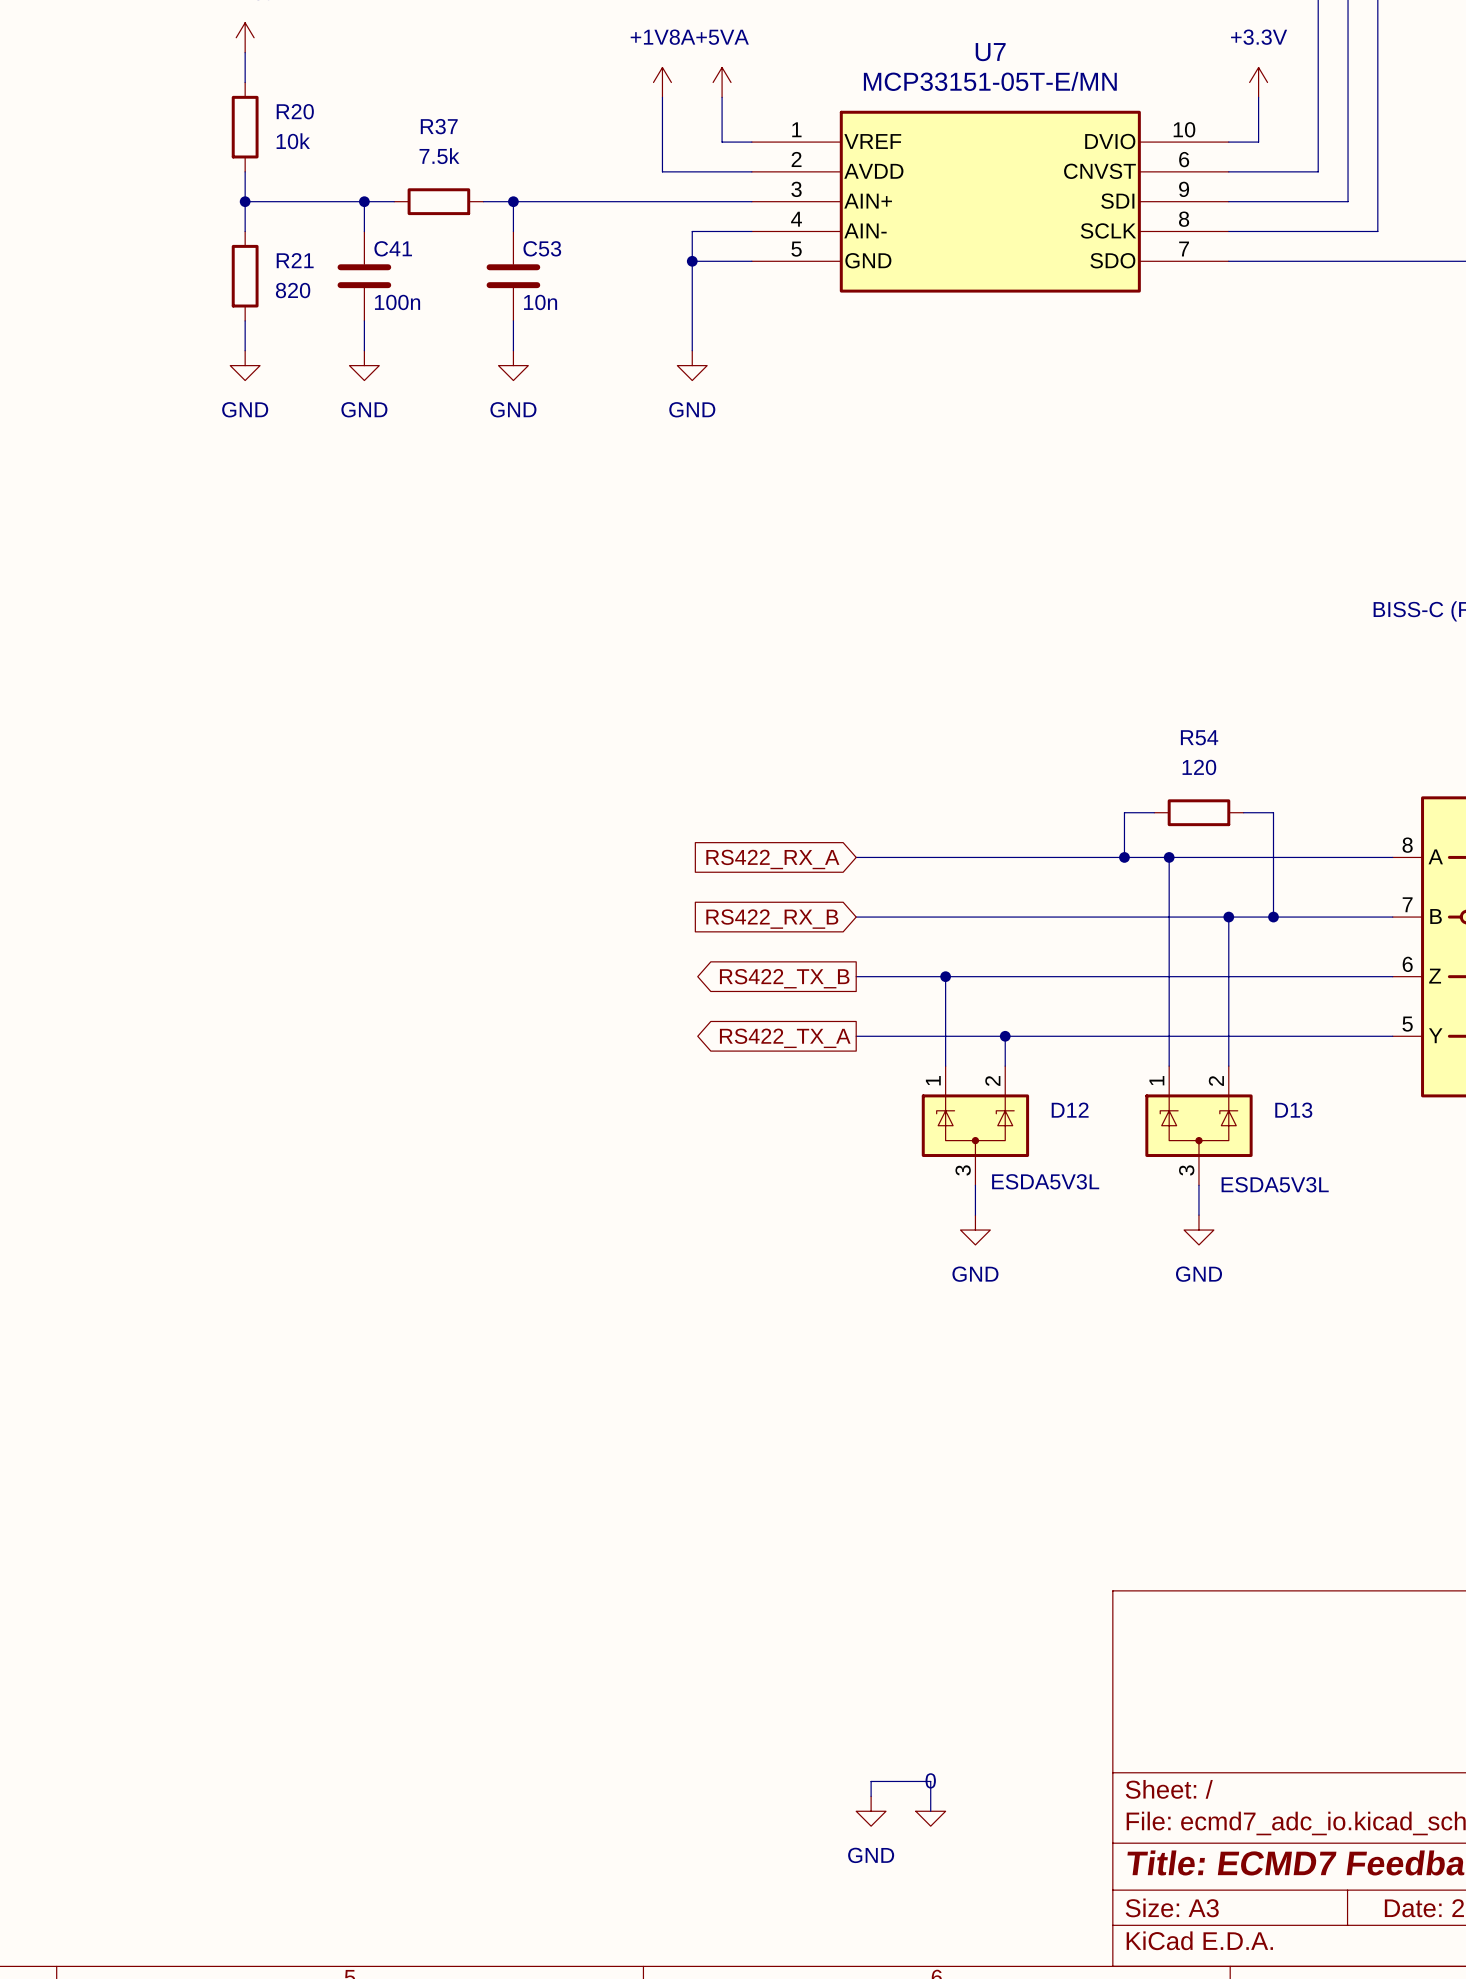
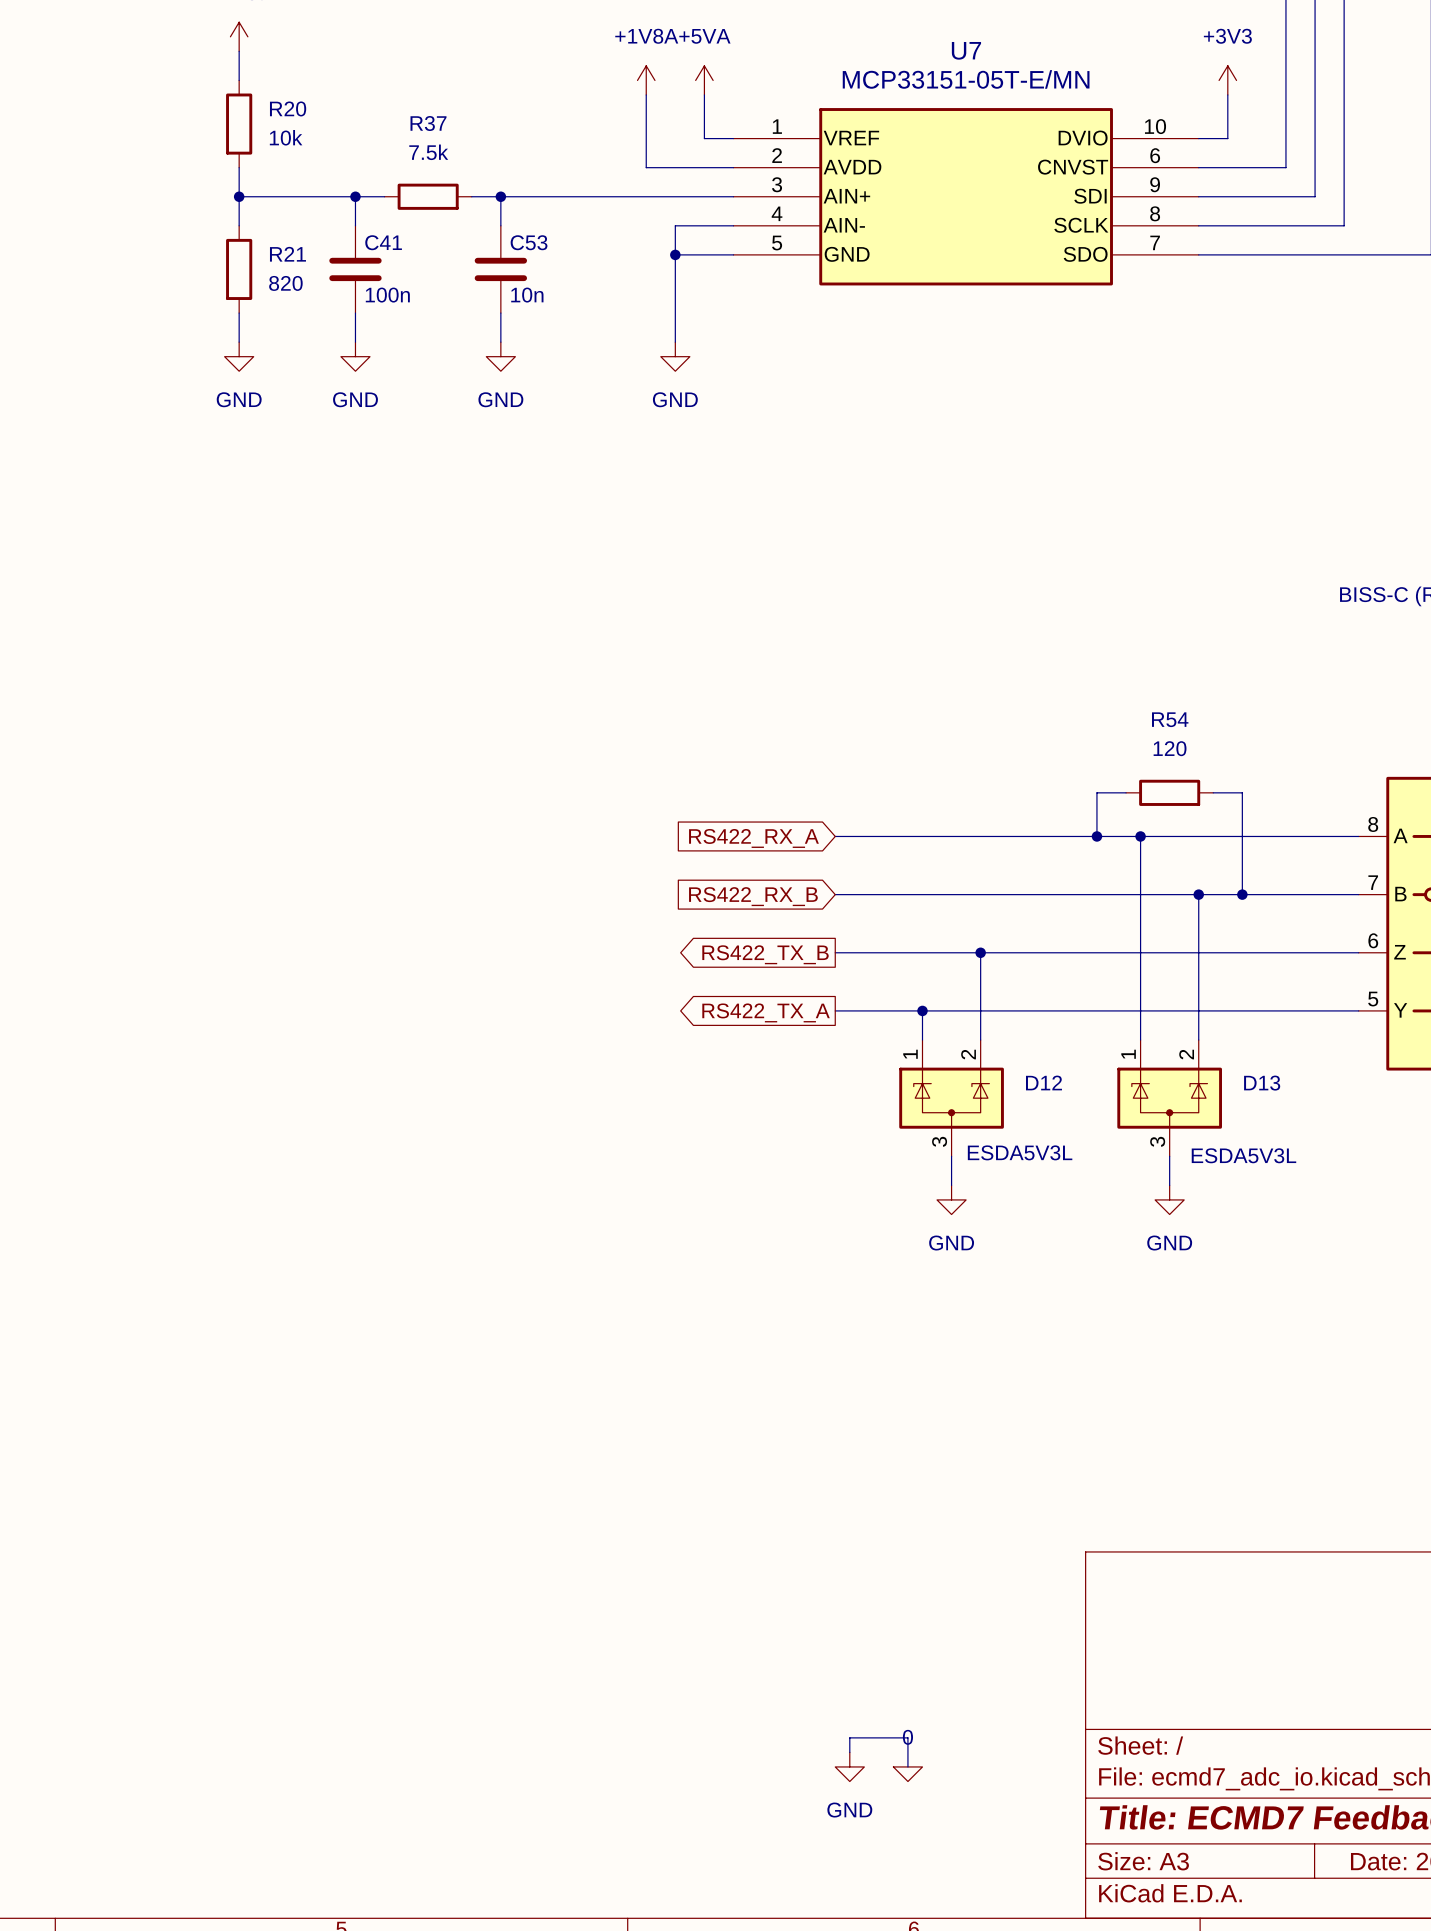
power symbol: +3.3V (1258, 82) -> +3V3 (1227, 80)
wire: (945, 976) (945, 1036) -> (980, 952) (980, 1010)
junction: (945, 976) -> none
junction: none -> (980, 952)
junction: none -> (922, 1010)
junction: (1005, 1036) -> none

